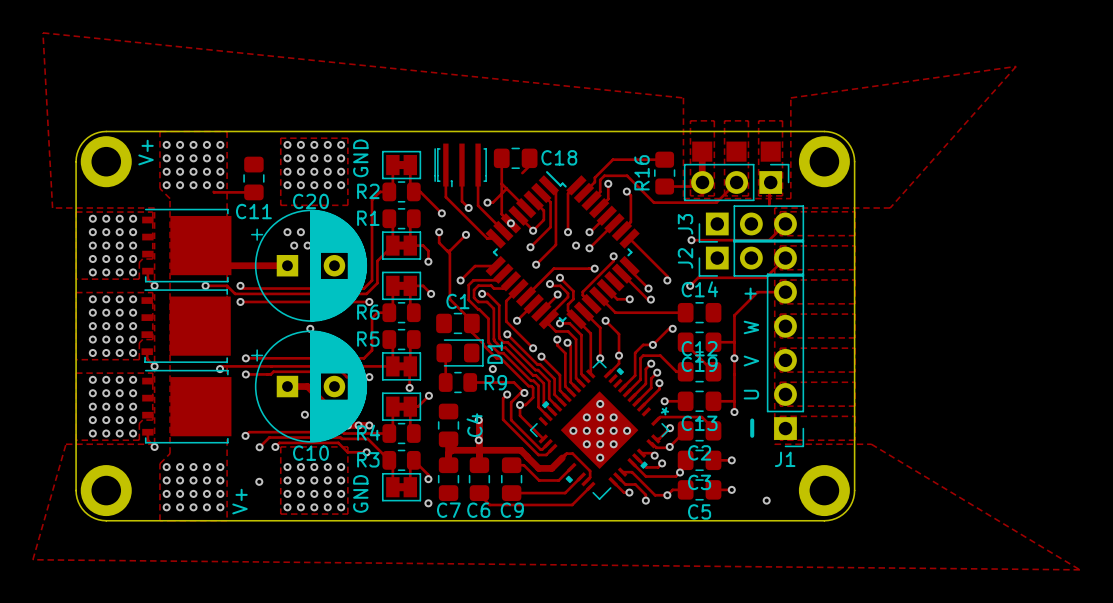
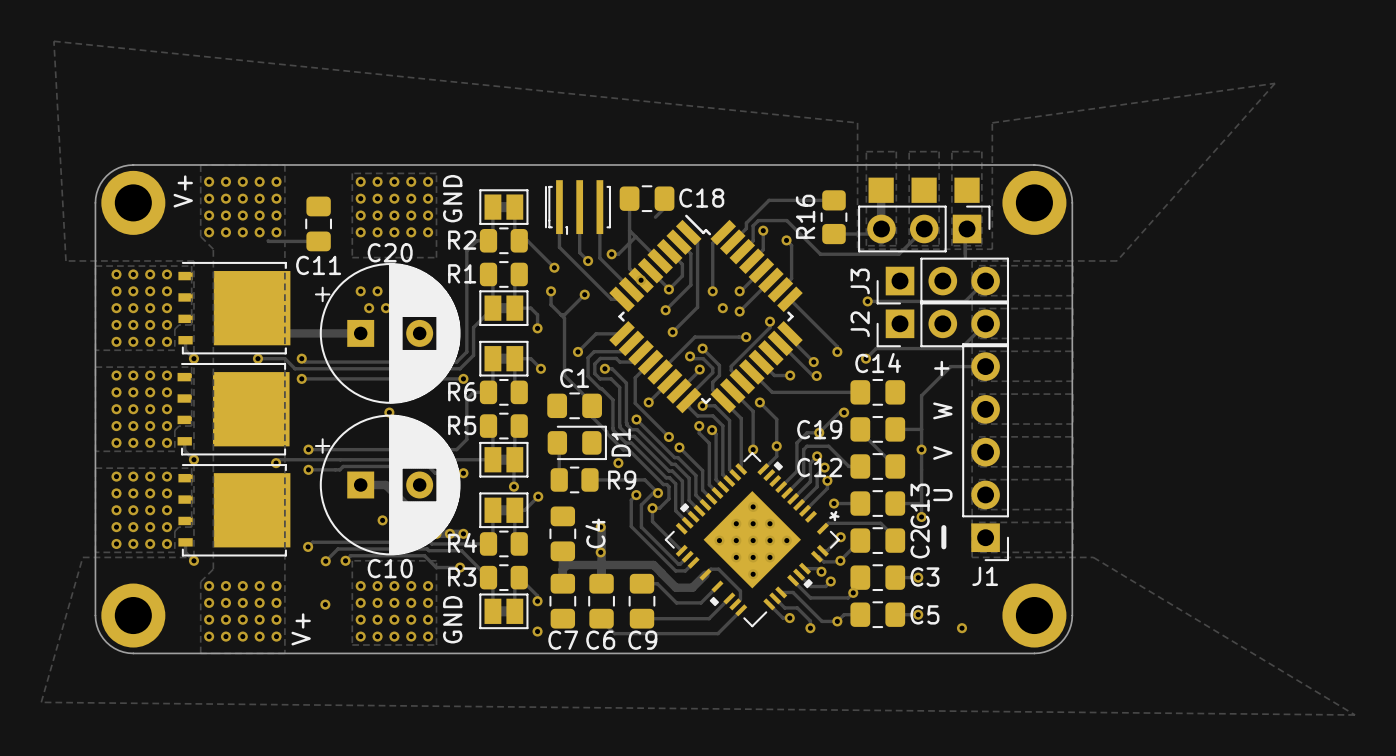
C12 name position: C12 (699, 348) -> C12 (819, 467)
C19 name position: C19 (699, 364) -> C19 (819, 429)
C13 name rotation: 0° (699, 423) -> 90° counterclockwise (920, 506)
C2 name rotation: 0° (699, 452) -> 90° counterclockwise (920, 543)
C2 name position: C2 (699, 452) -> C2 (920, 543)
C3 name position: C3 (699, 482) -> C3 (924, 577)
C5 name position: C5 (699, 511) -> C5 (924, 614)

